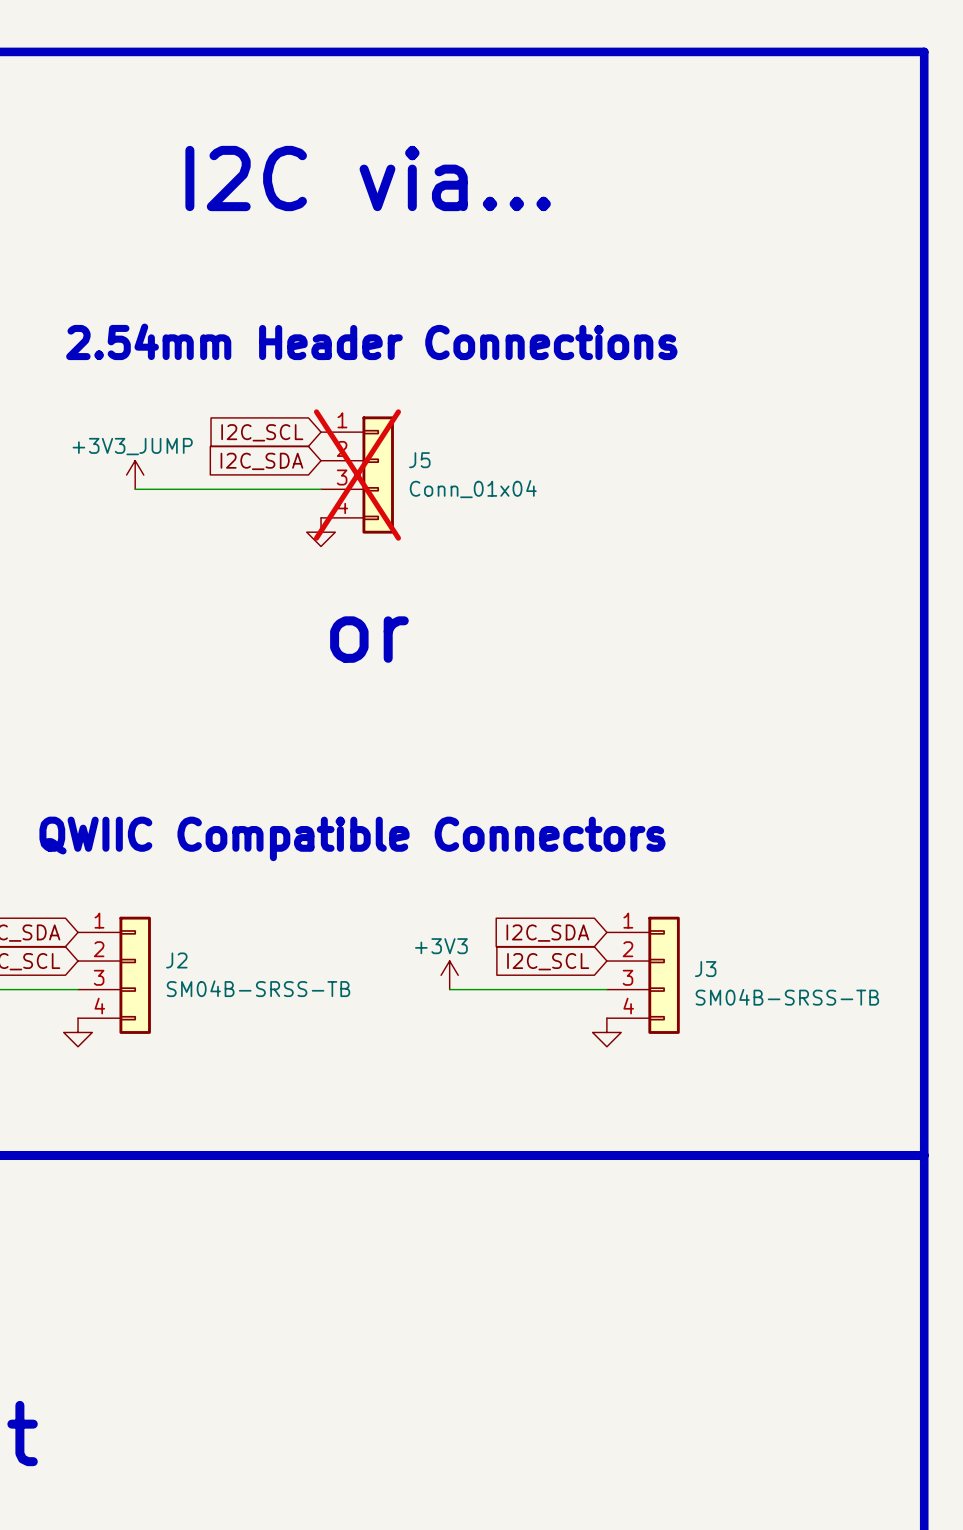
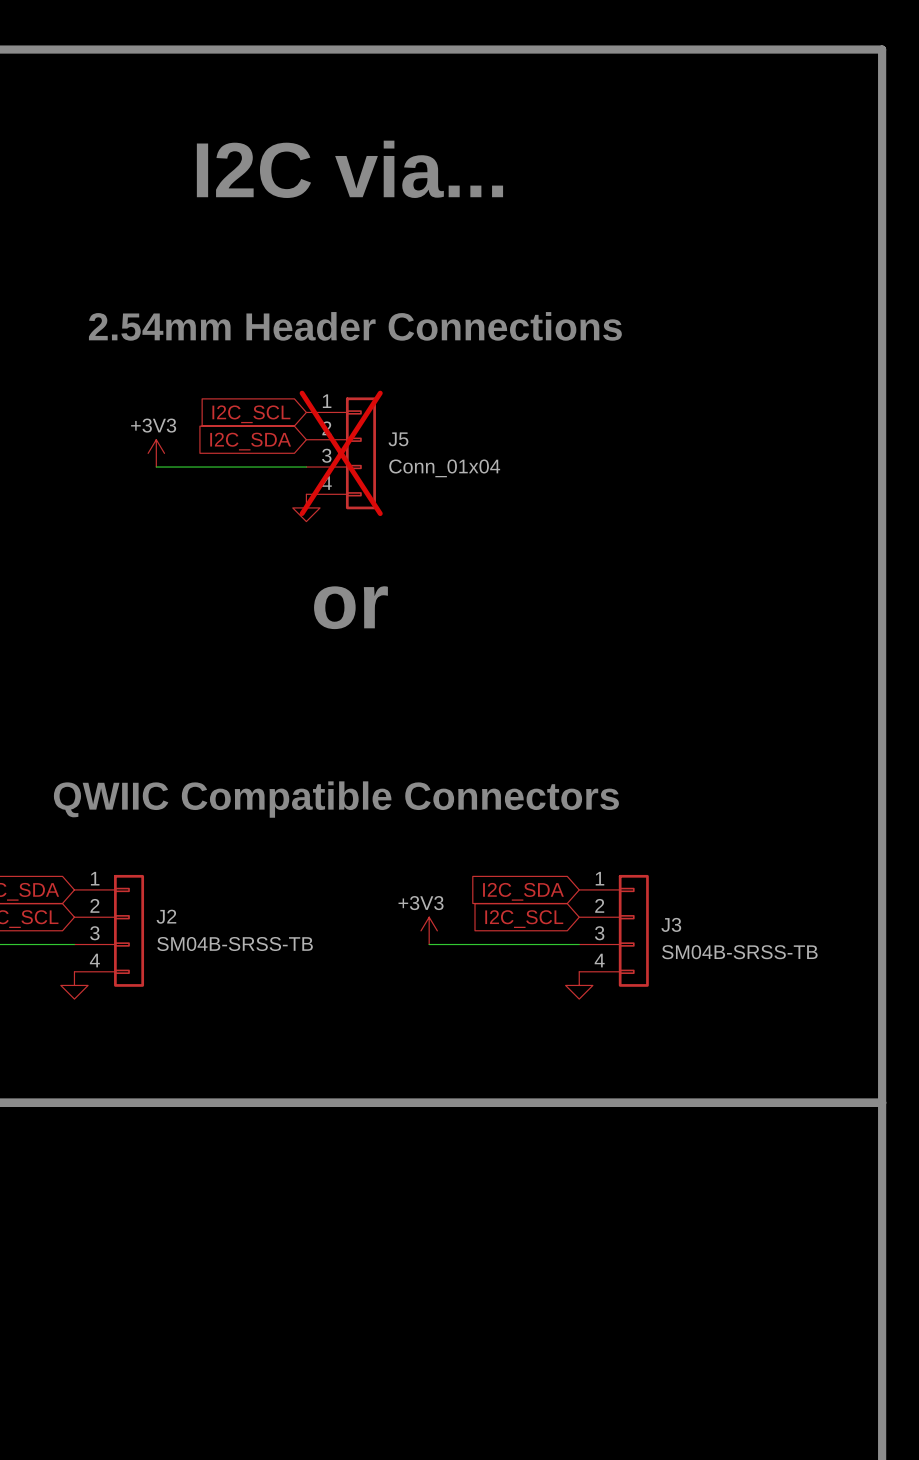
power symbol: +3V3_JUMP (135, 475) -> none
power symbol: none -> +3V3 (156, 453)
wire: (135, 489) (163, 489) -> none

